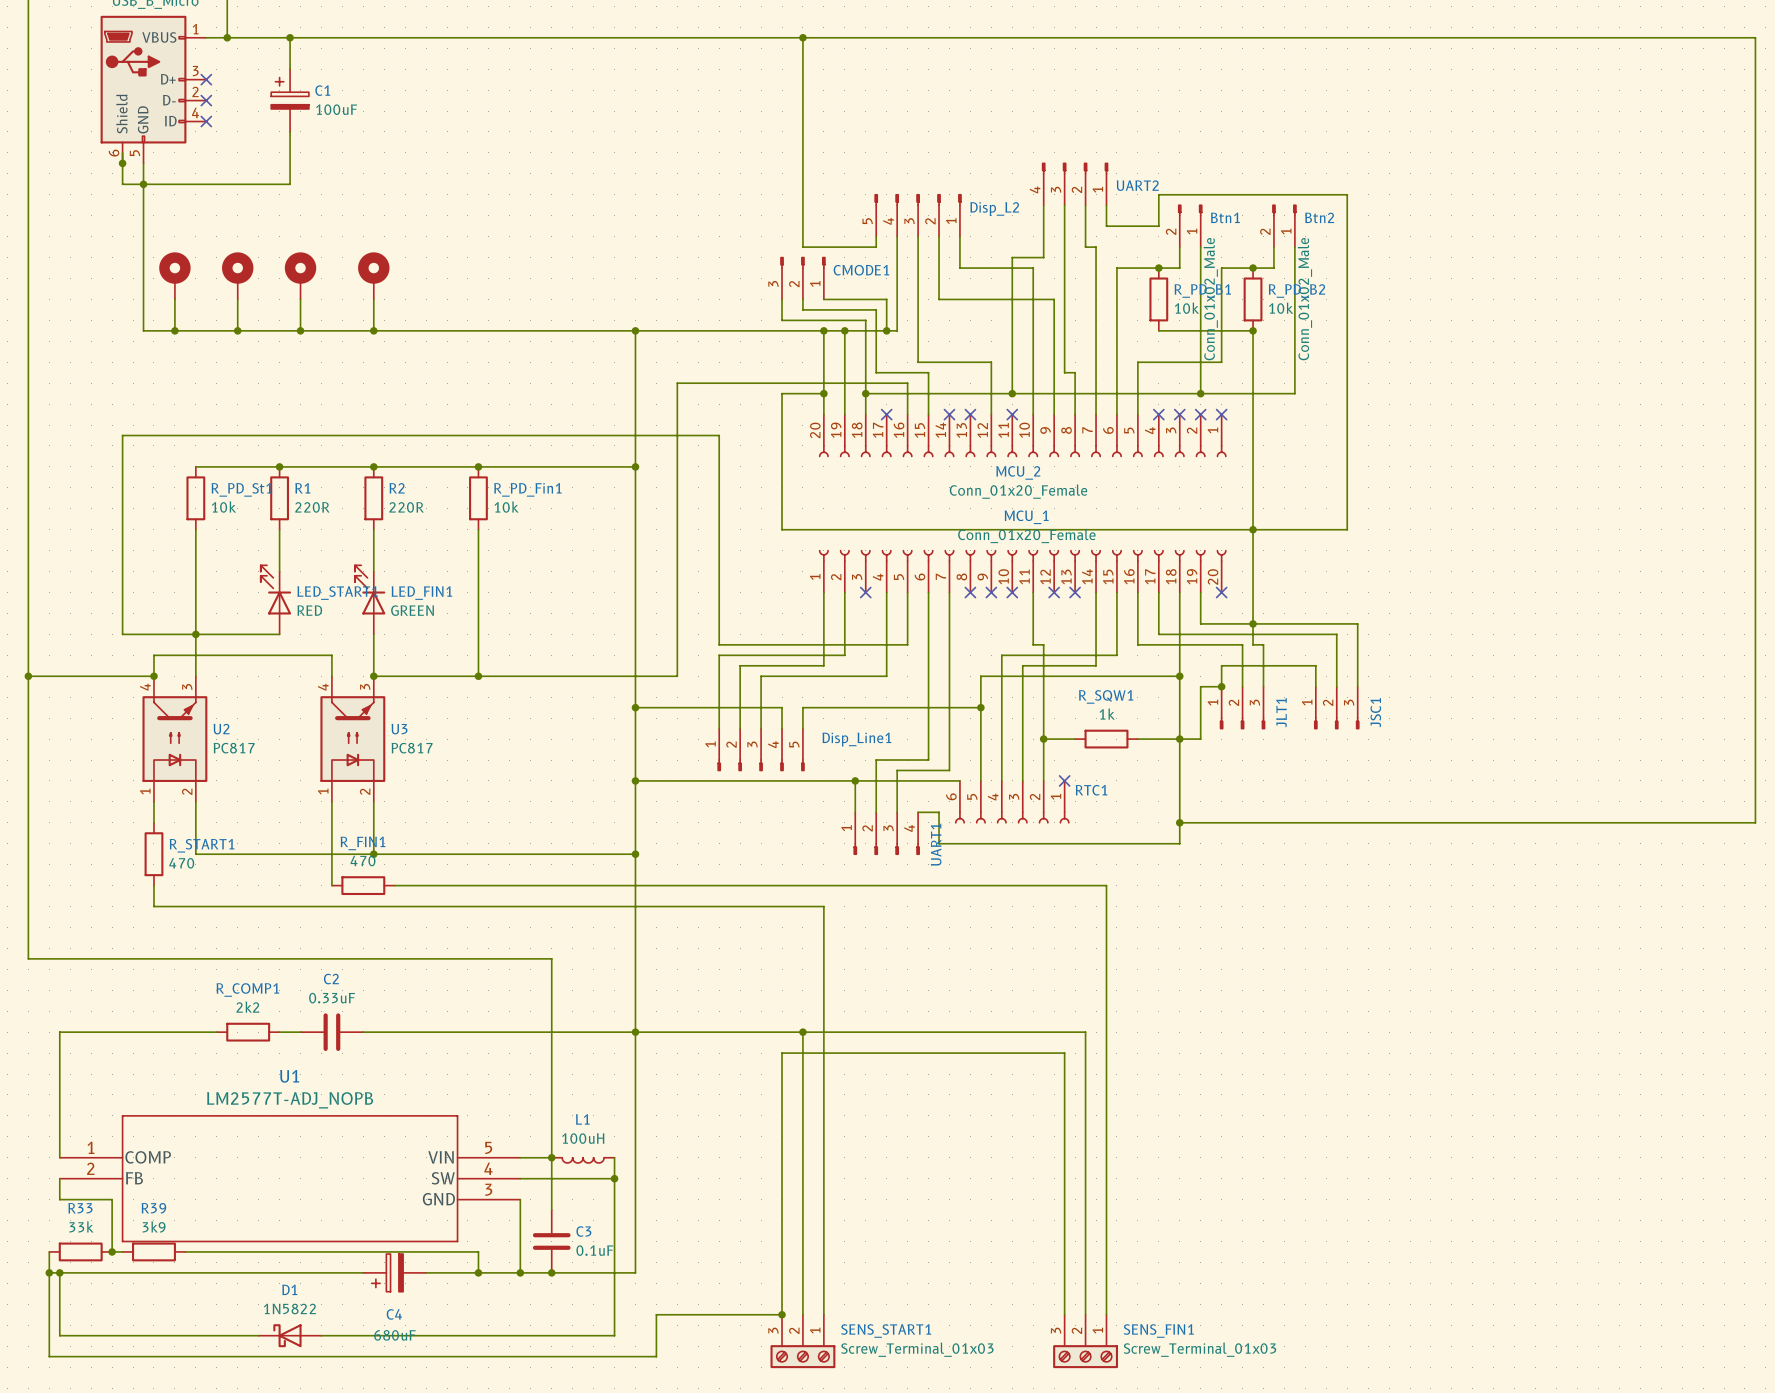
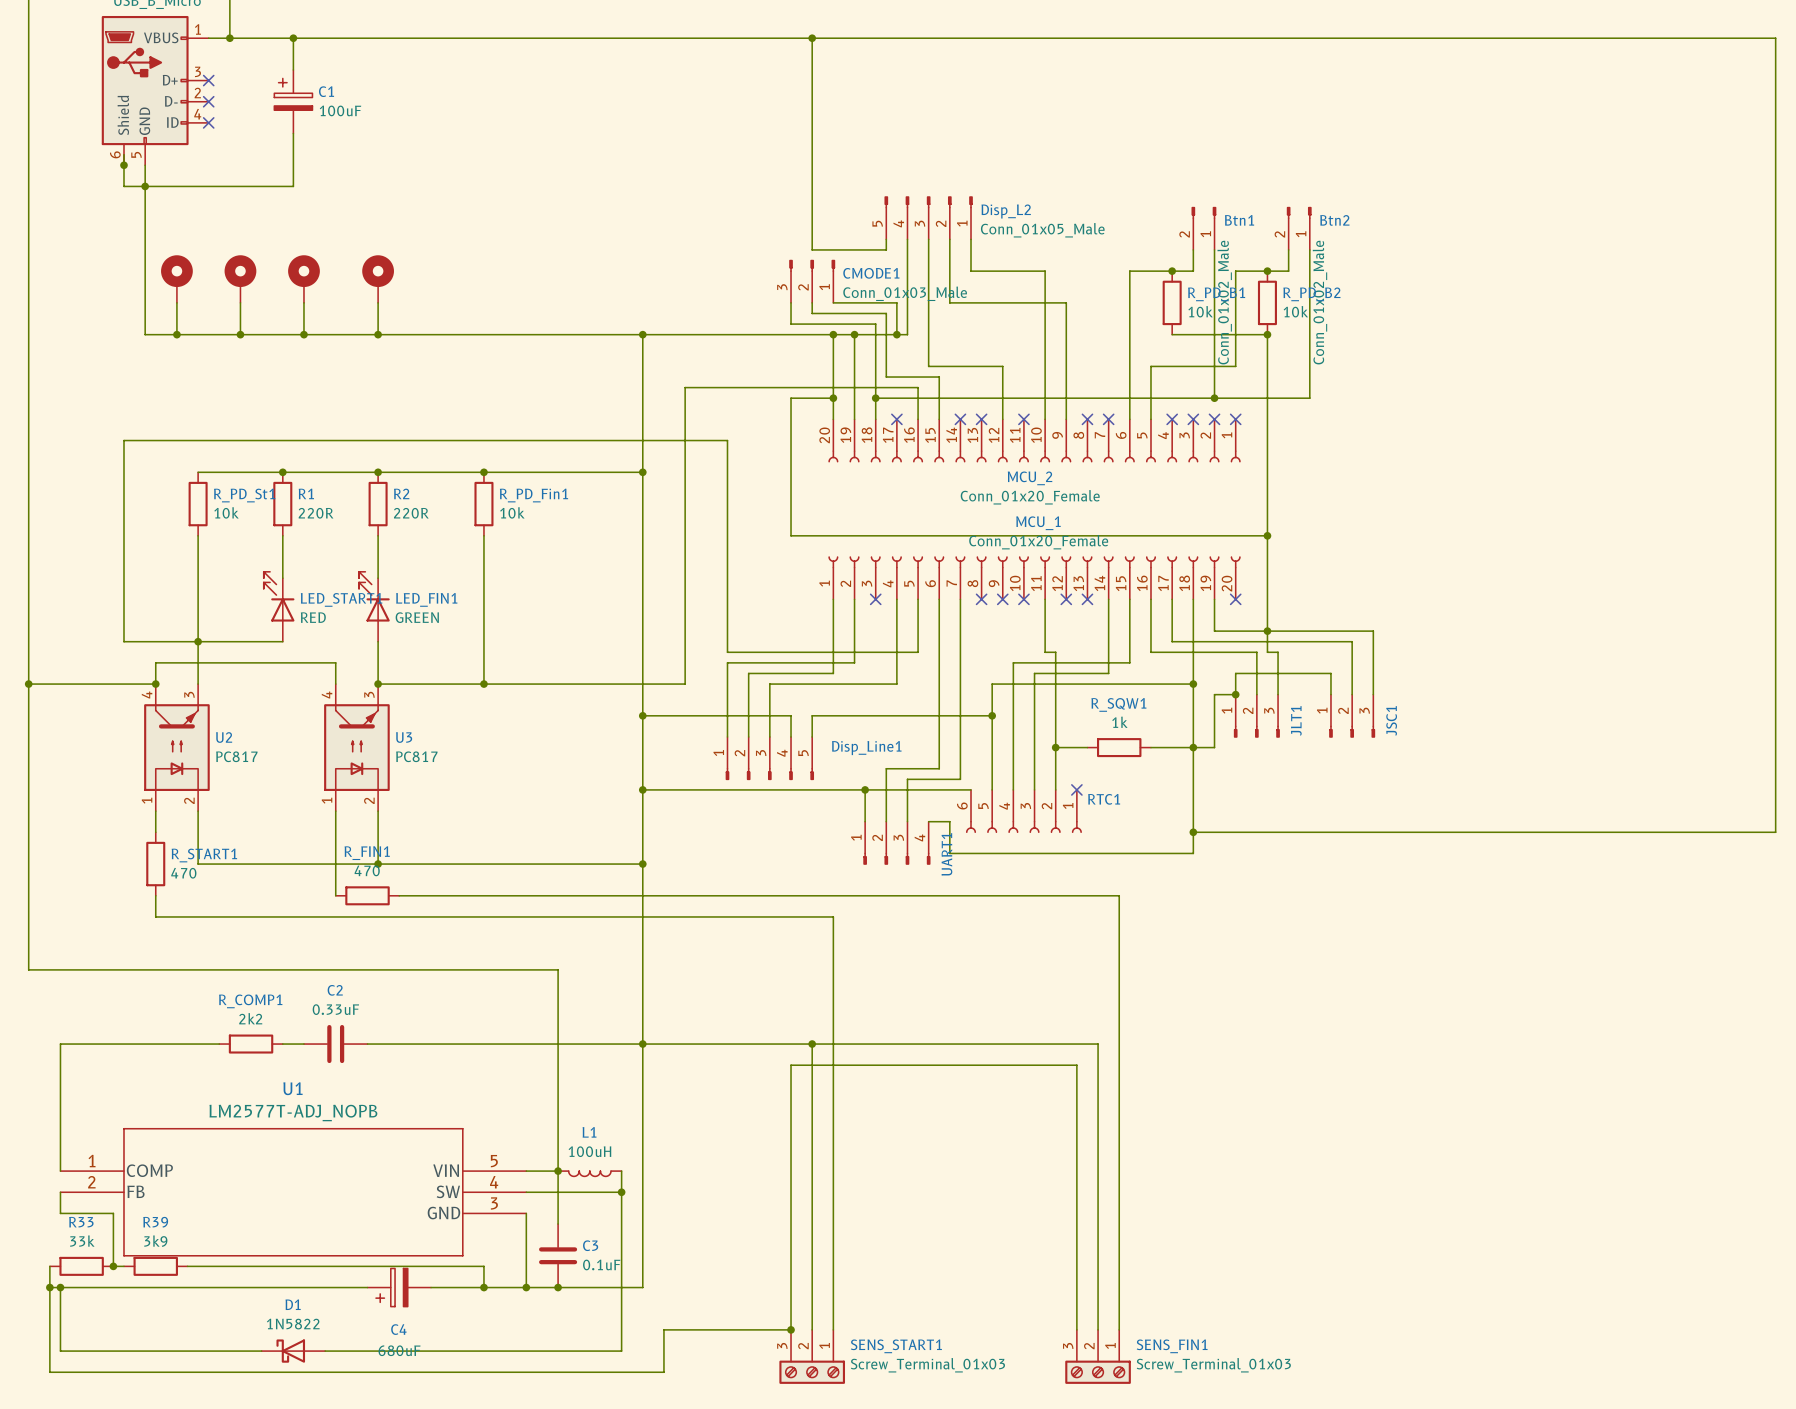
UART2: (1075, 184) -> none
wire: (1043, 205) (1043, 257) (1012, 257) (1012, 393) -> none
wire: (1064, 205) (1064, 372) (1075, 372) (1075, 414) -> none
wire: (1085, 205) (1085, 247) (1096, 247) (1096, 414) -> none
wire: (1106, 205) (1106, 226) (1158, 226) (1158, 194) (1347, 194) (1347, 529) (1253, 529) -> none
Disp_L2 value: none -> Conn_01x05_Male (1042, 230)
CMODE1 value: none -> Conn_01x03_Male (905, 293)
junction: (1012, 393) -> none
no-connect mark: none -> (1087, 419)
no-connect mark: none -> (1108, 419)

